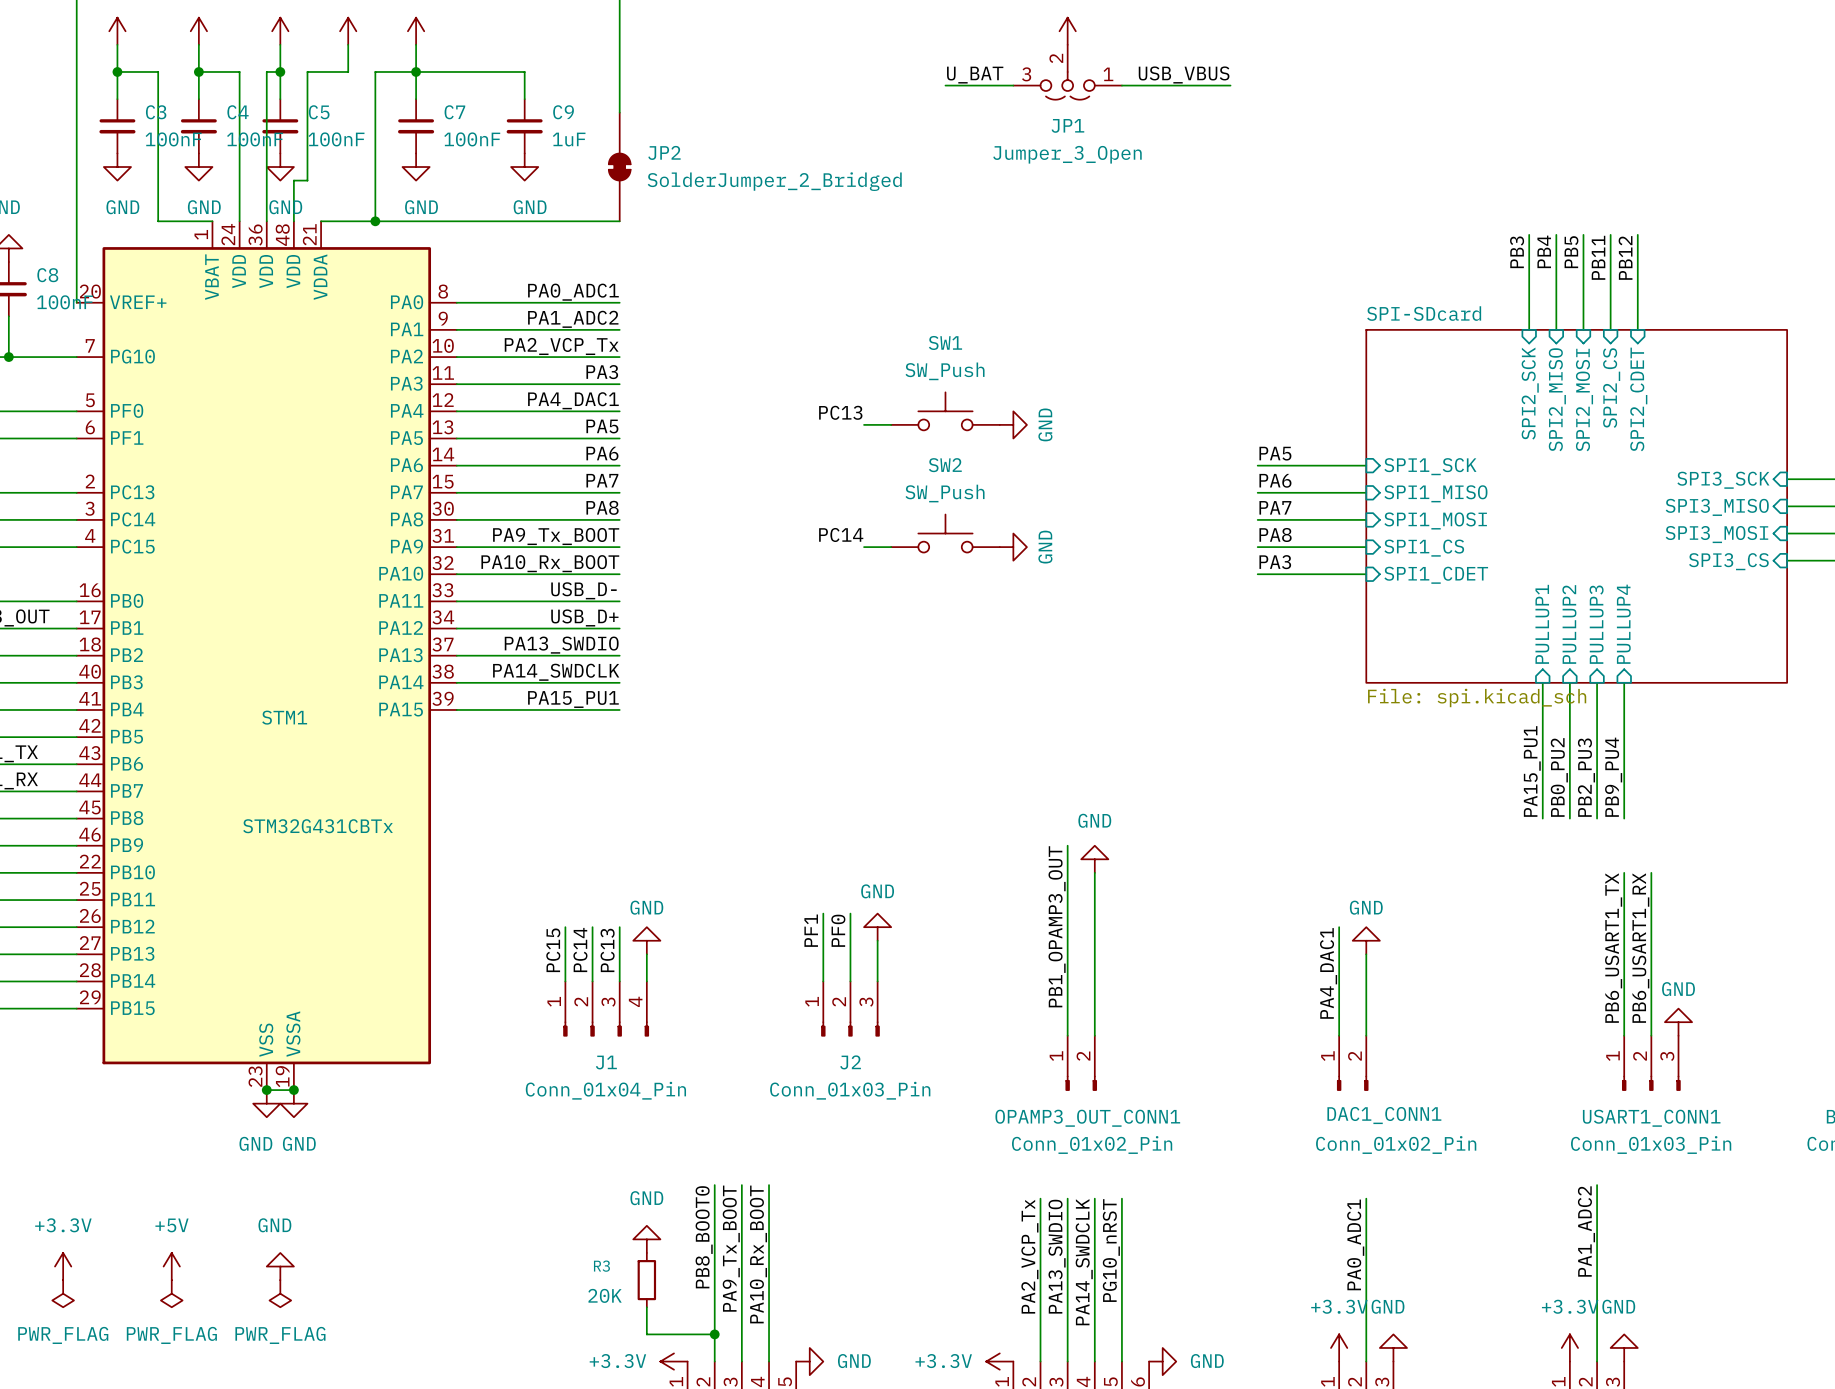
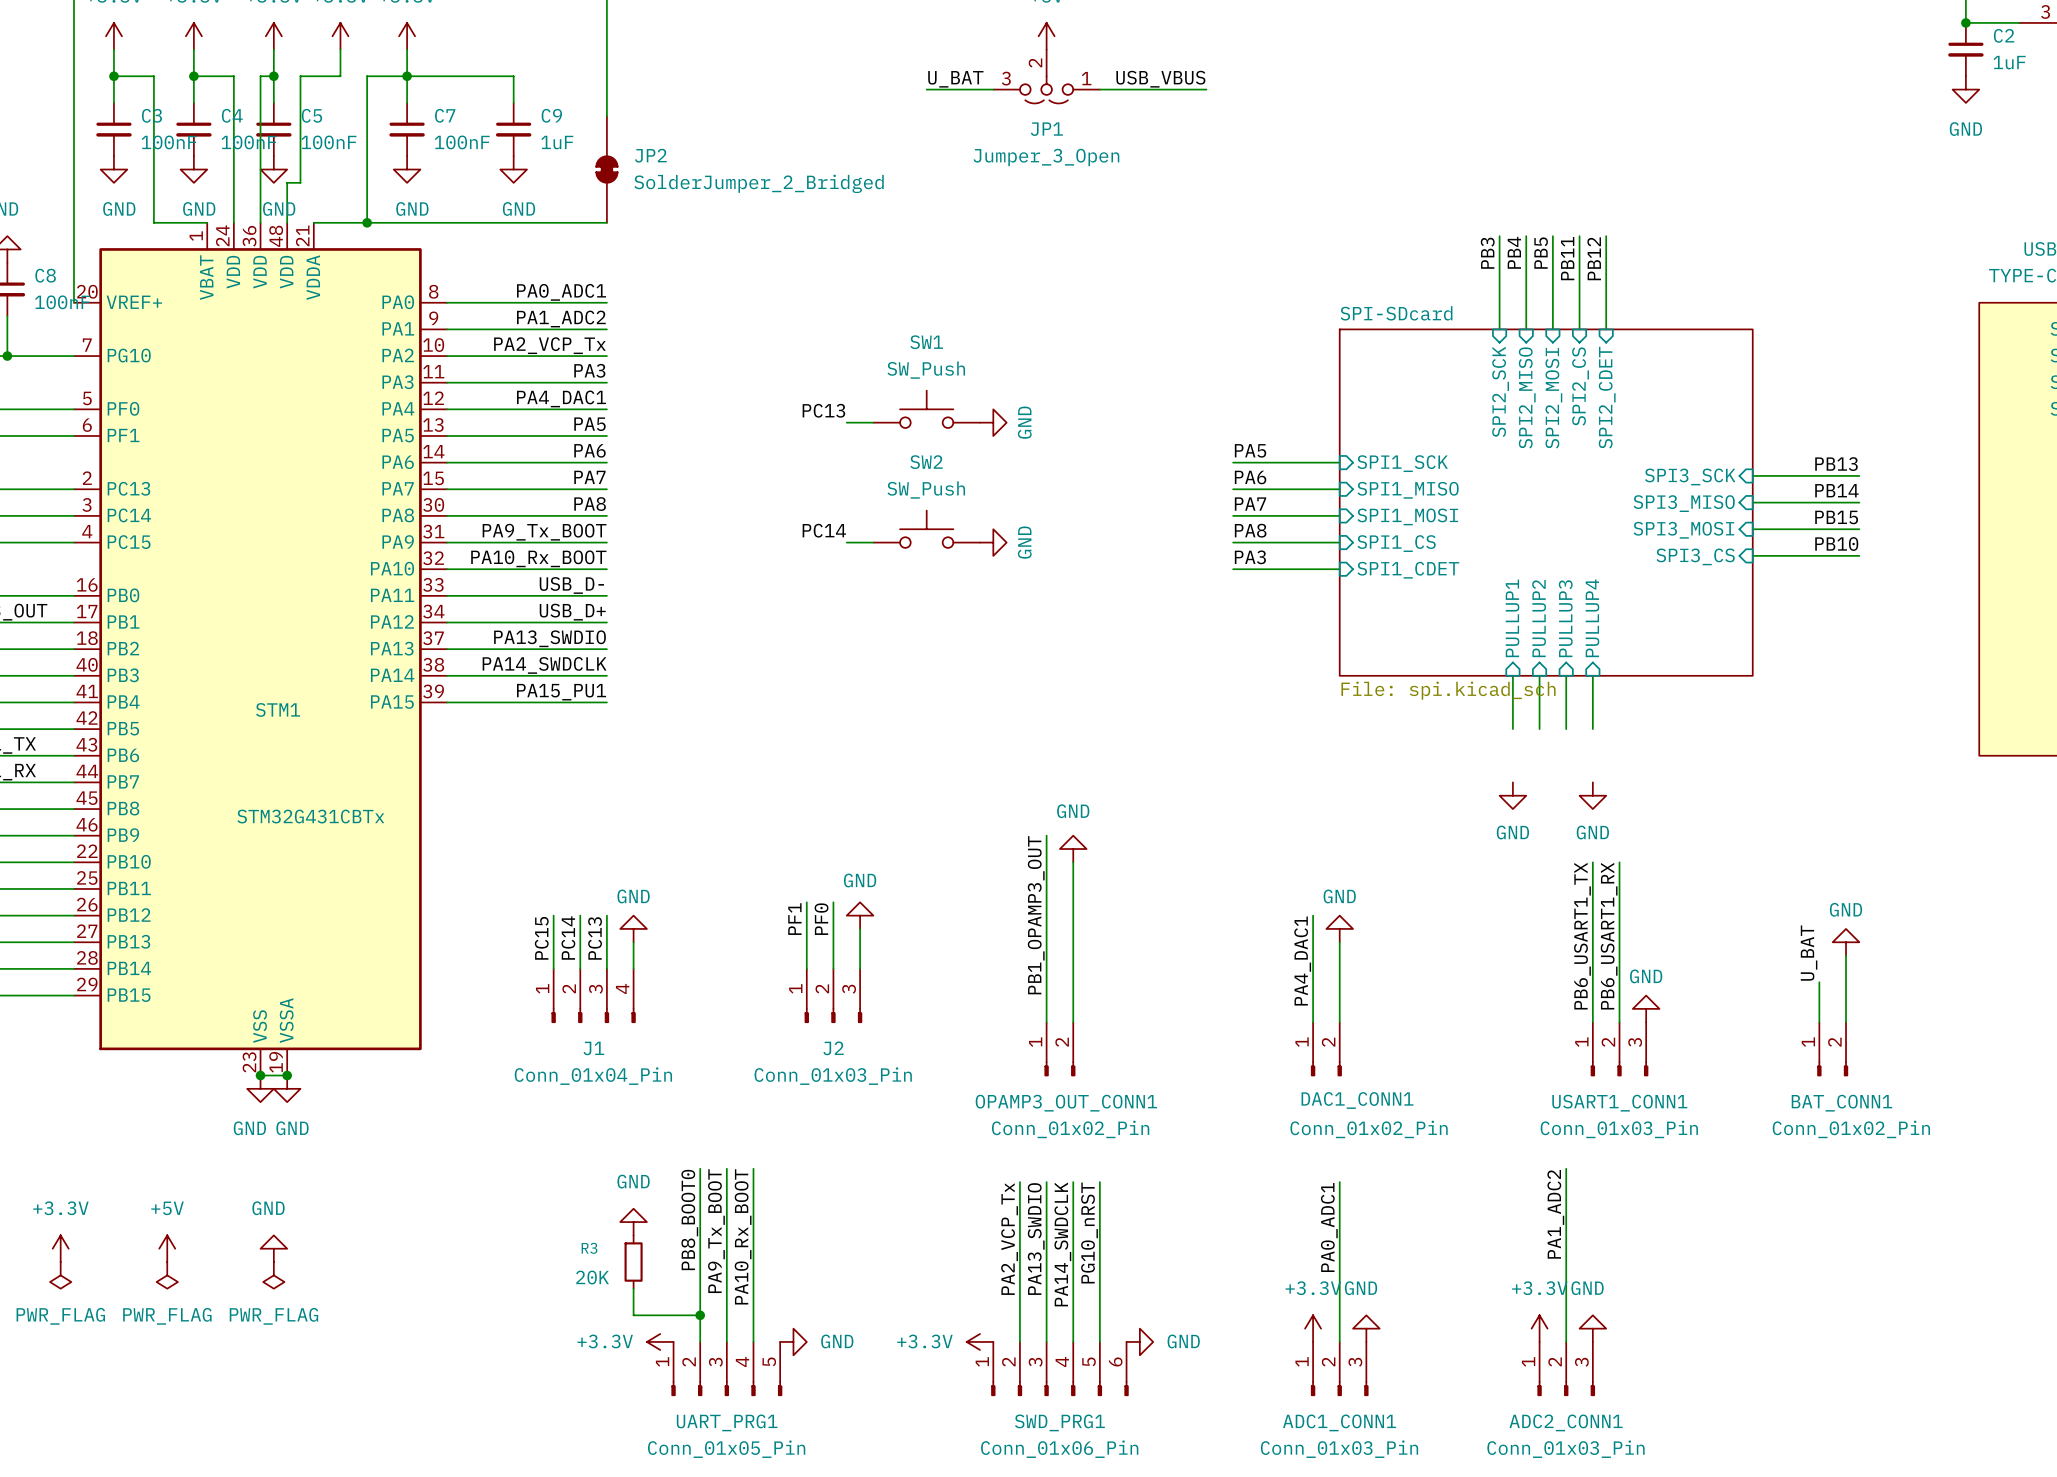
wire: (1542, 737) (1542, 818) -> none
wire: (1569, 737) (1569, 818) -> none
wire: (1597, 737) (1597, 818) -> none
wire: (1624, 737) (1624, 818) -> none
label: PA15_PU1 (1532, 771) -> none
label: PB0_PU2 (1559, 777) -> none
label: PB2_PU3 (1586, 777) -> none
label: PB9_PU4 (1613, 777) -> none
power symbol: none -> GND (1512, 795)
power symbol: none -> GND (1592, 795)

